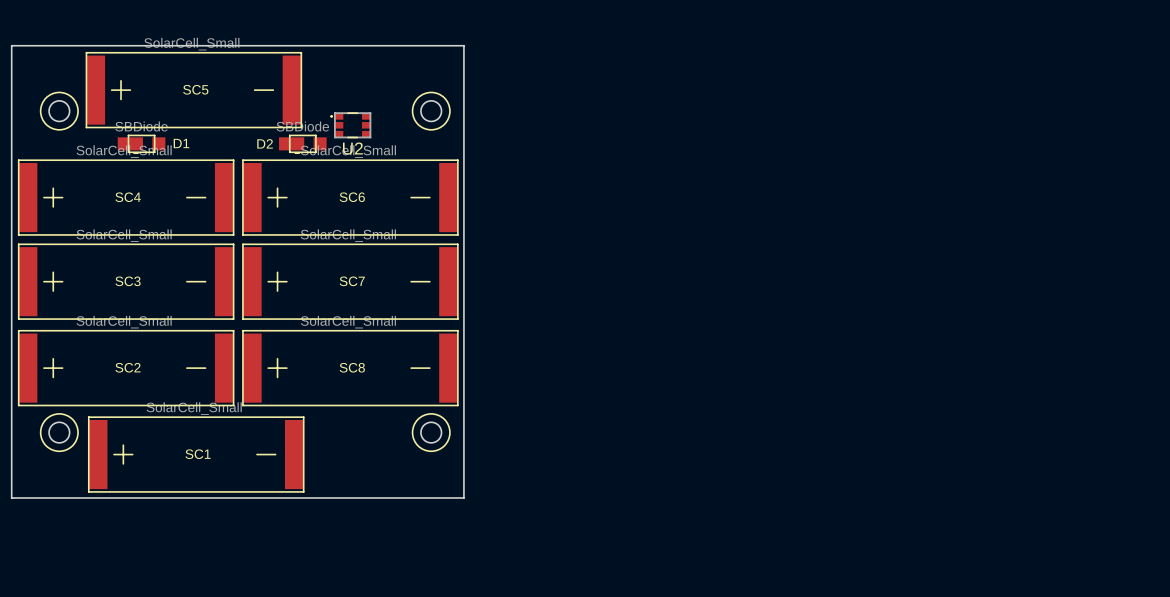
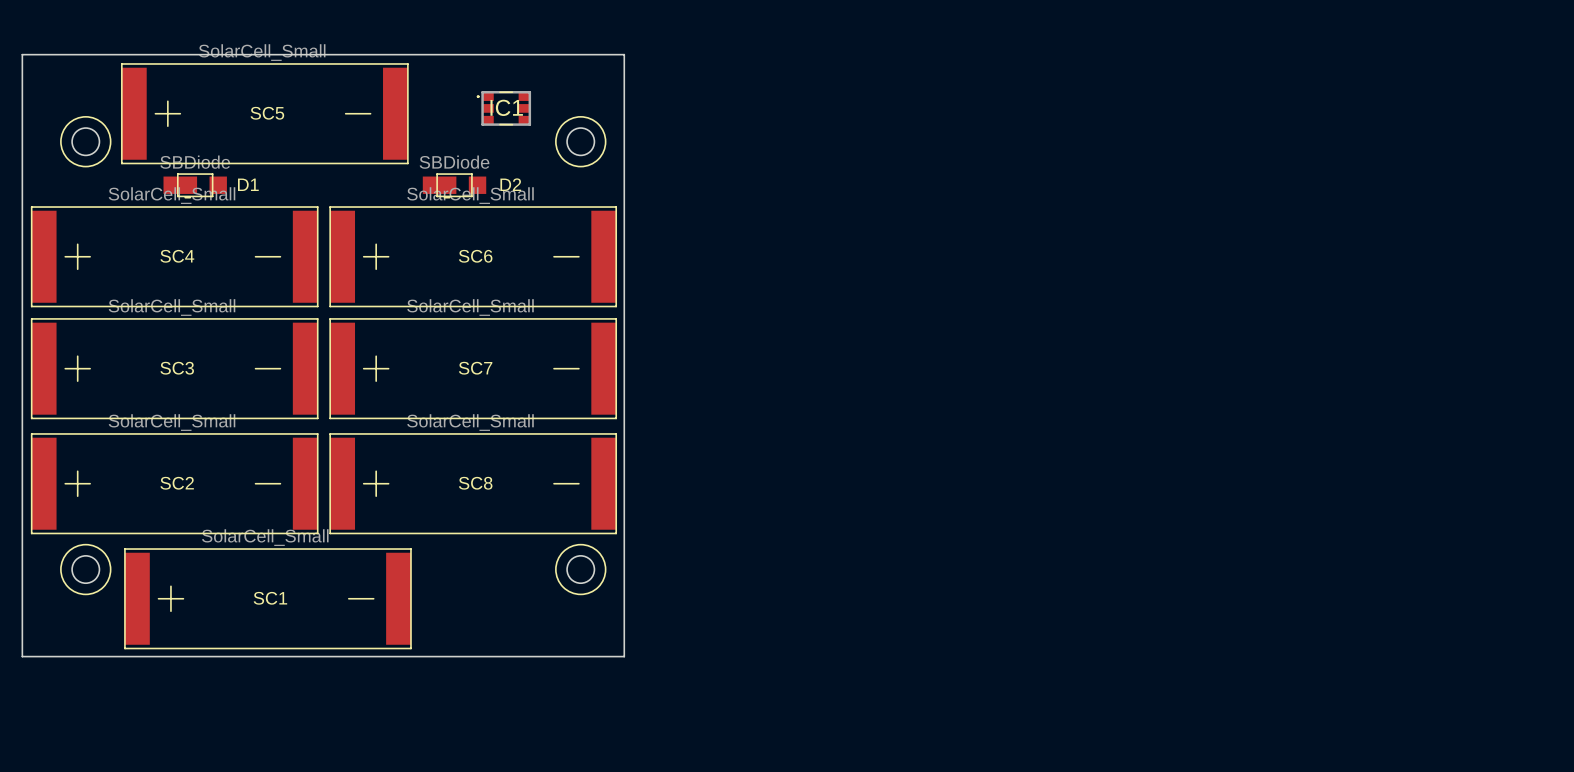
IC1: none -> (504, 108)
U2: (351, 125) -> none
D2 name position: D2 (265, 143) -> D2 (510, 184)
D2 position: (302, 144) -> (454, 185)

